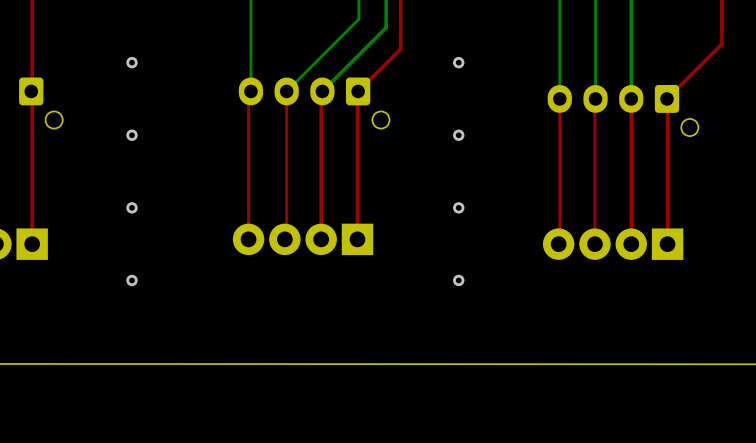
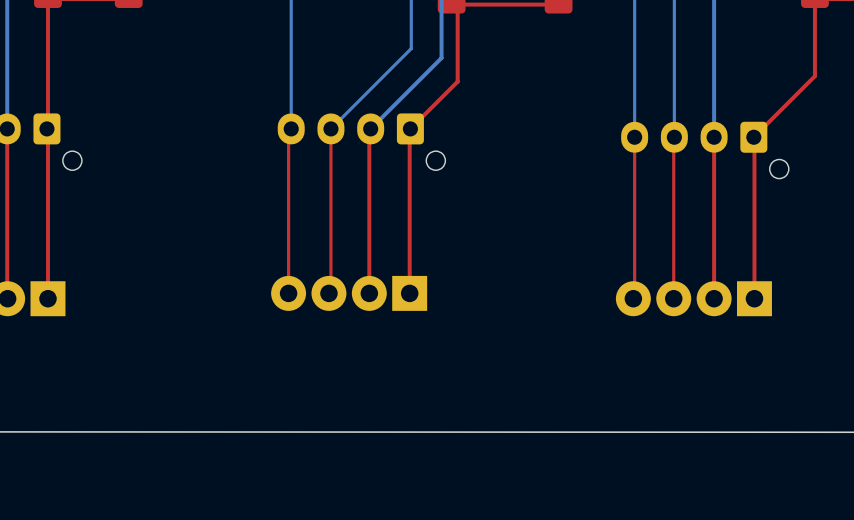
via: (132, 62) -> none
via: (458, 62) -> none
via: (132, 135) -> none
via: (458, 135) -> none
via: (132, 207) -> none
via: (458, 207) -> none
via: (132, 280) -> none
via: (458, 280) -> none

